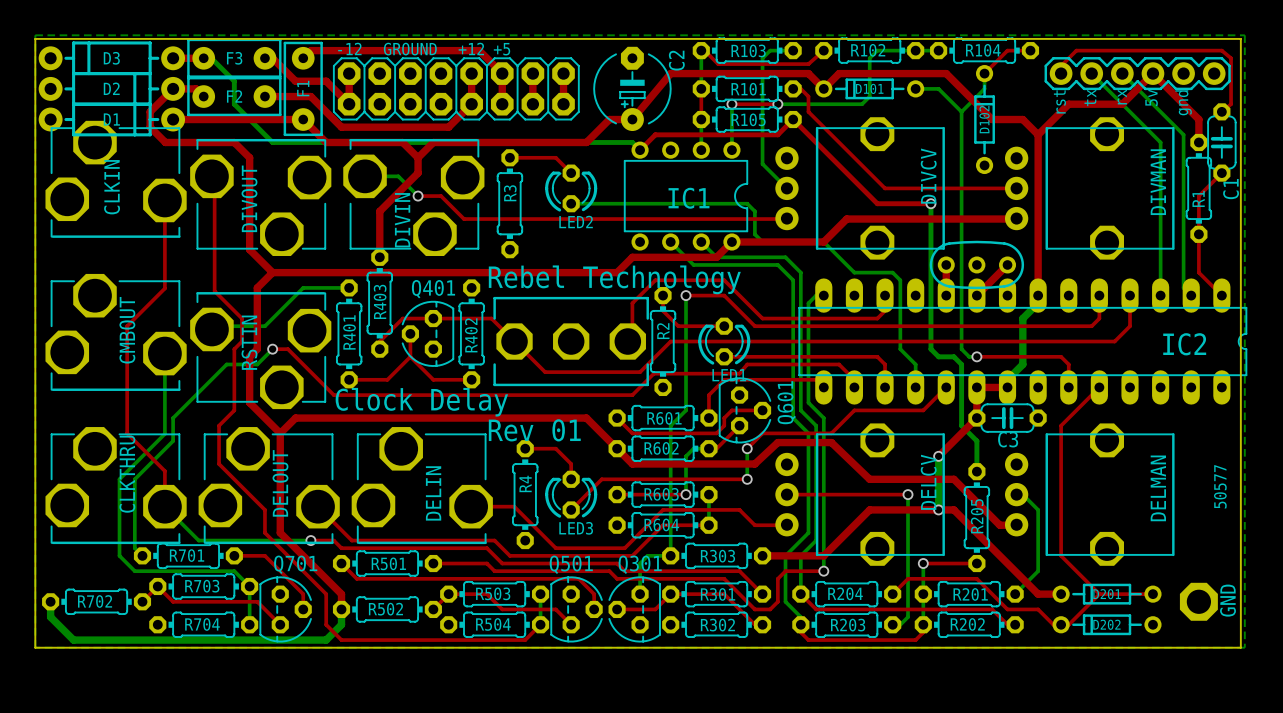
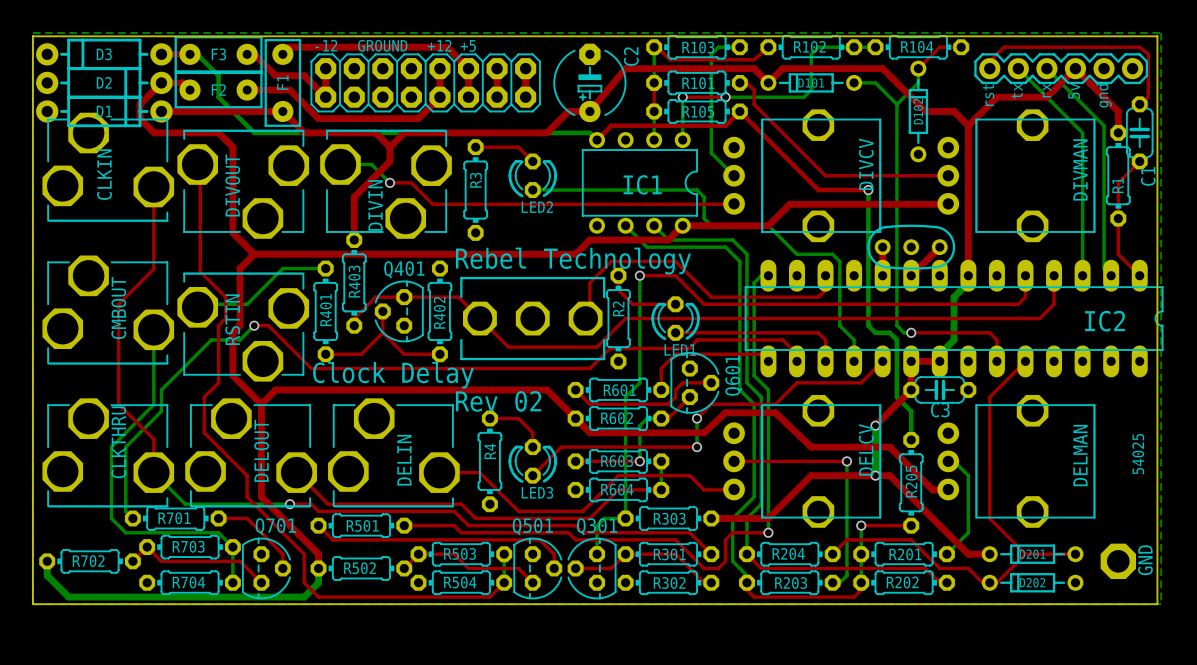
text: Rev 01 (534, 430) -> Rev 02 (498, 401)
text: 50577 (1220, 486) -> 54025 (1138, 454)

